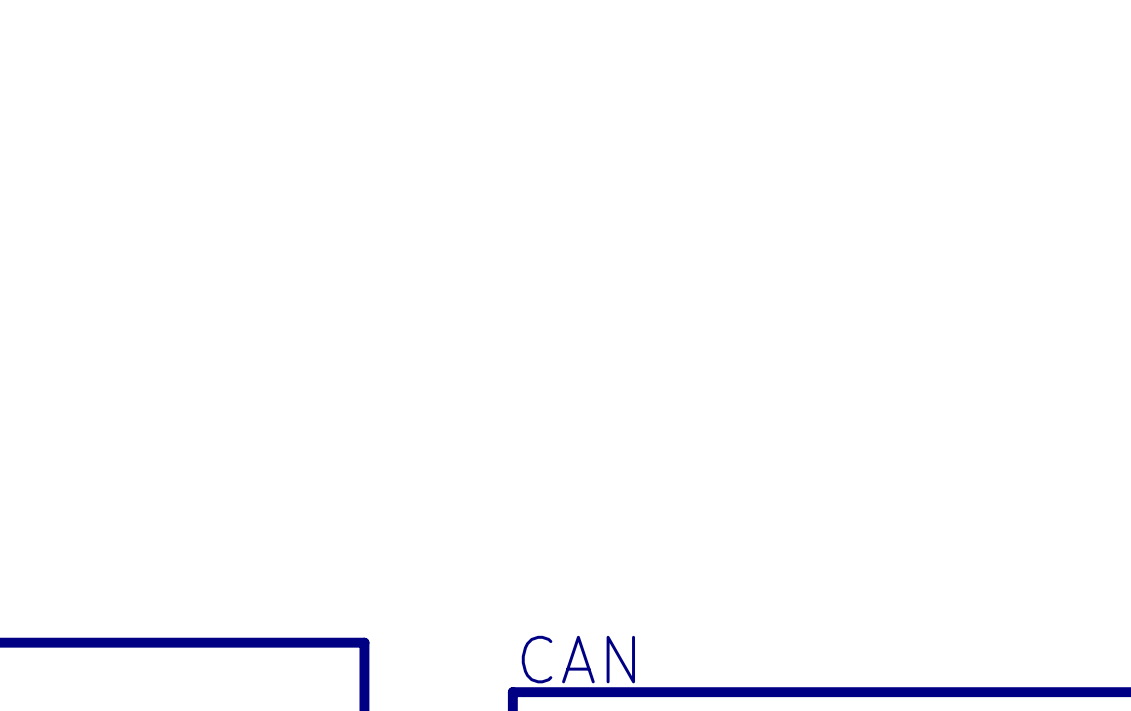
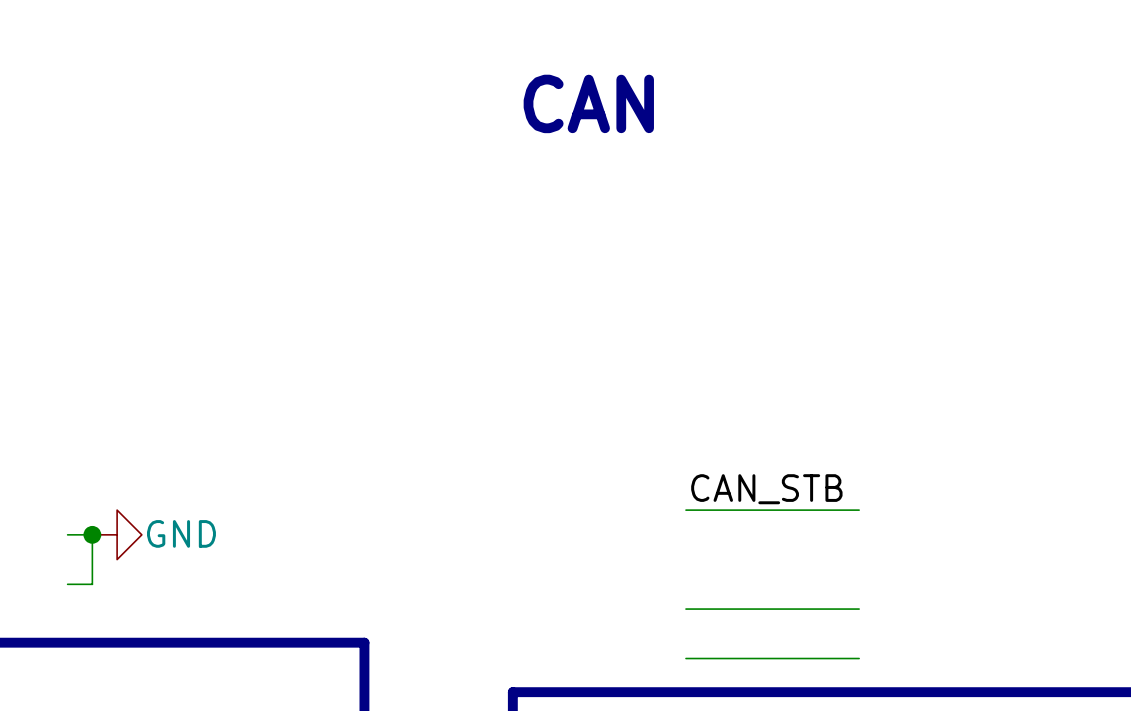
text: none -> CAN (588, 103)
label: none -> CAN_STB (766, 489)
wire: none -> (685, 510) (859, 510)
wire: none -> (67, 534) (92, 534) (92, 584) (67, 584)
junction: none -> (92, 534)
power symbol: none -> GND (117, 534)
wire: none -> (685, 609) (859, 609)
wire: none -> (685, 658) (859, 658)
text: CAN (578, 659) -> none

